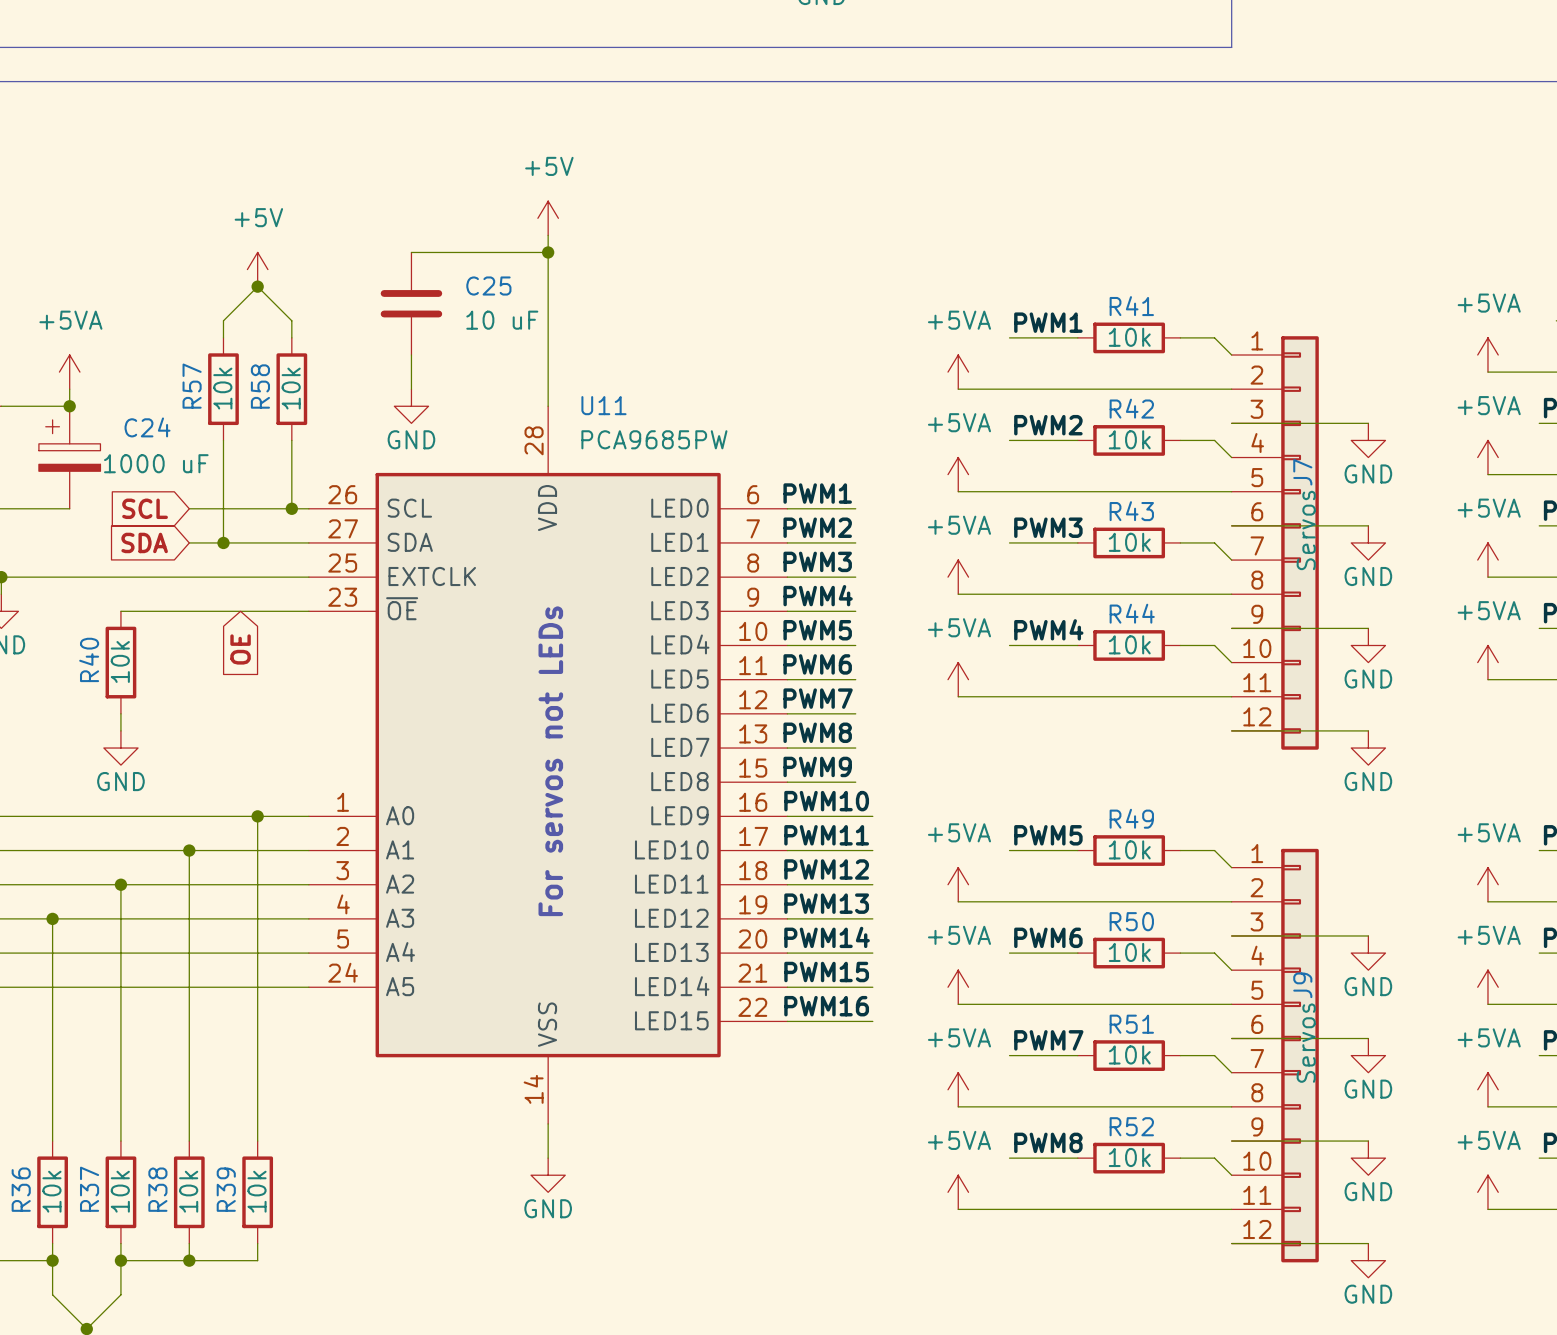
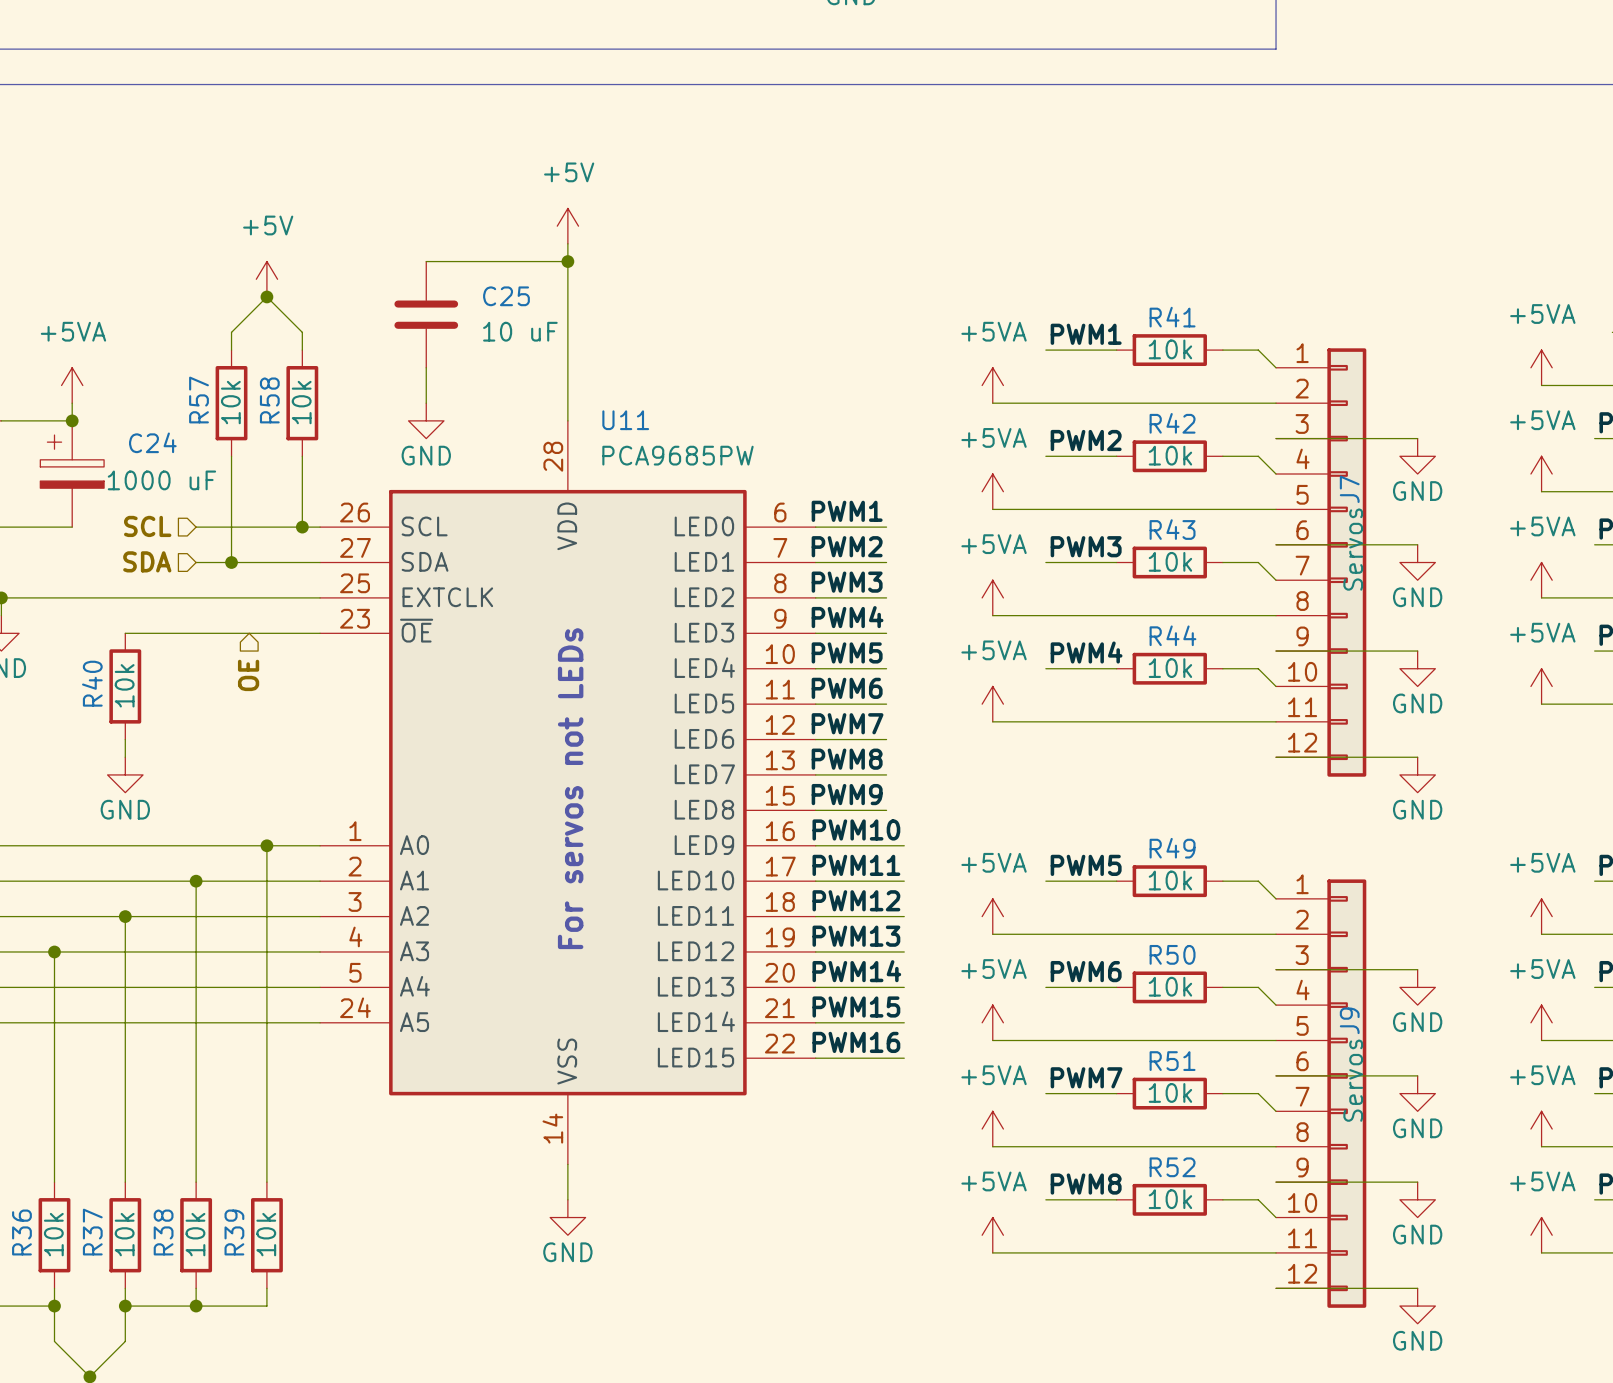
hierarchical label: none -> SCL (147, 526)
global label: SCL (145, 508) -> none
hierarchical label: none -> SDA (147, 561)
global label: SDA (144, 542) -> none
global label: OE (240, 649) -> none
hierarchical label: none -> OE (248, 675)

